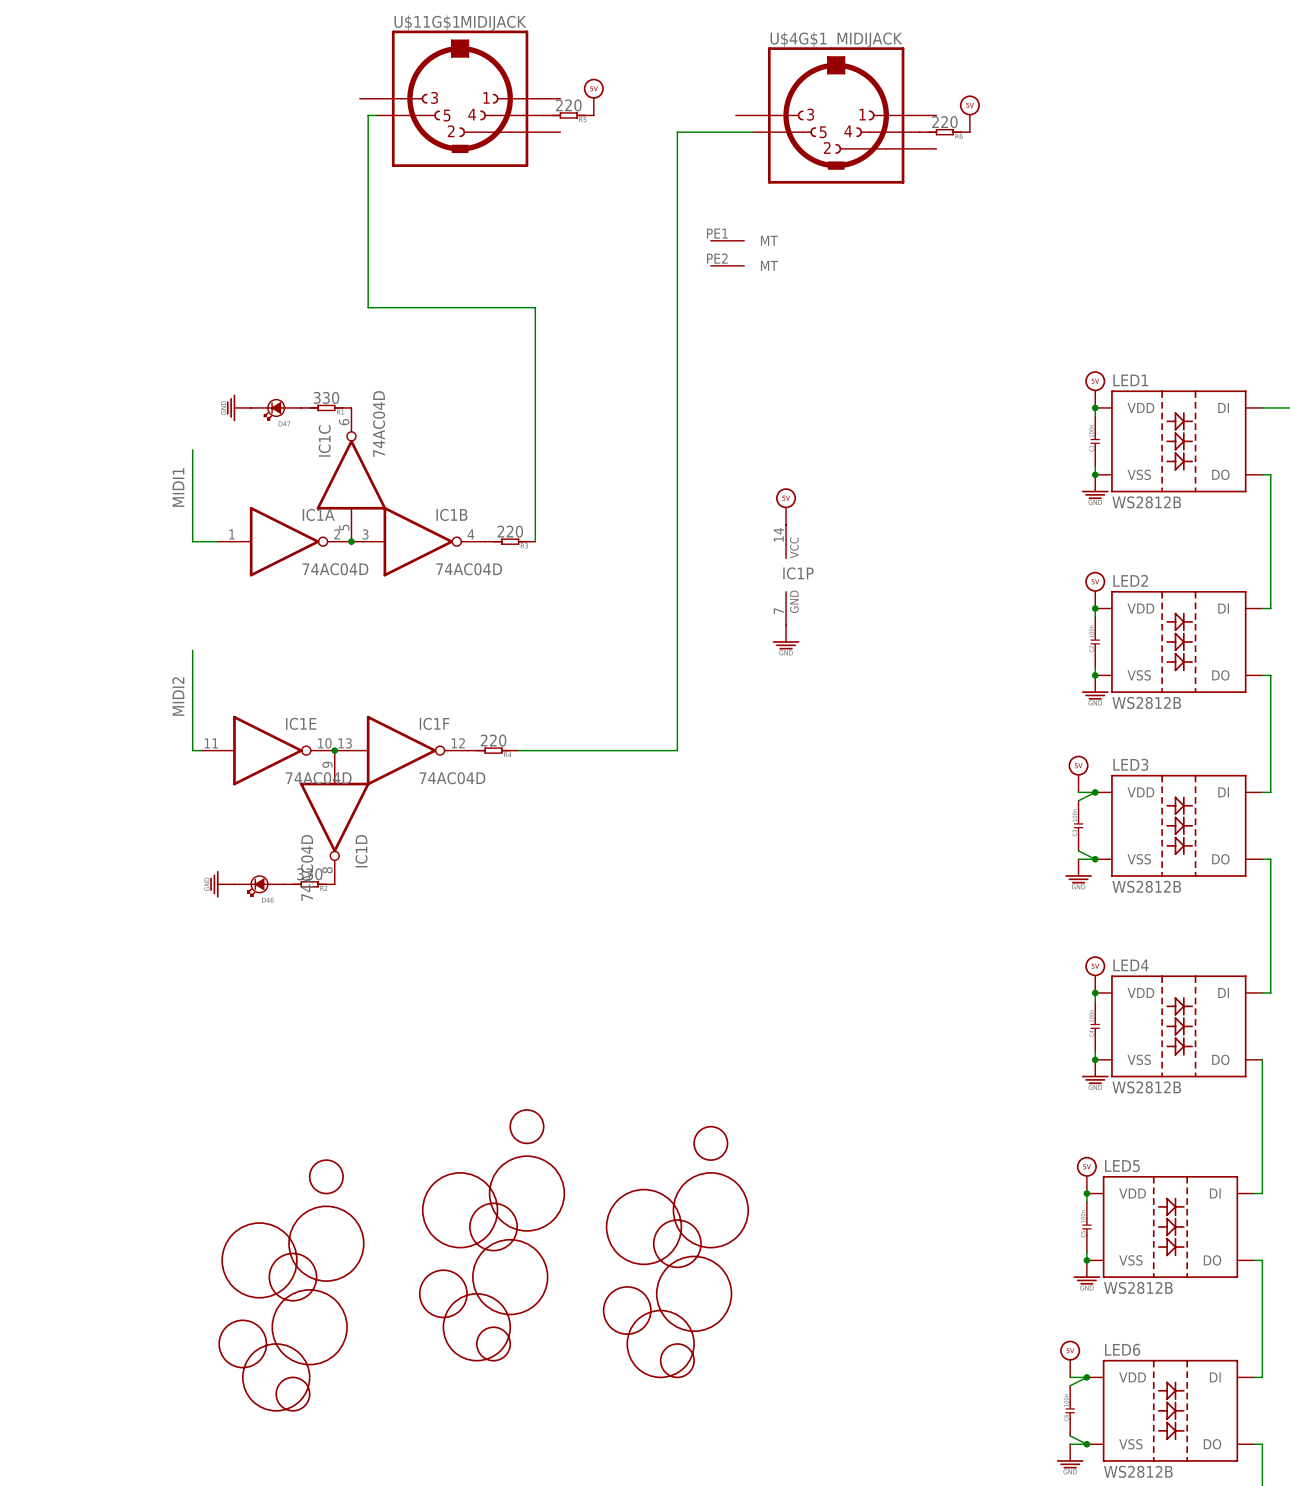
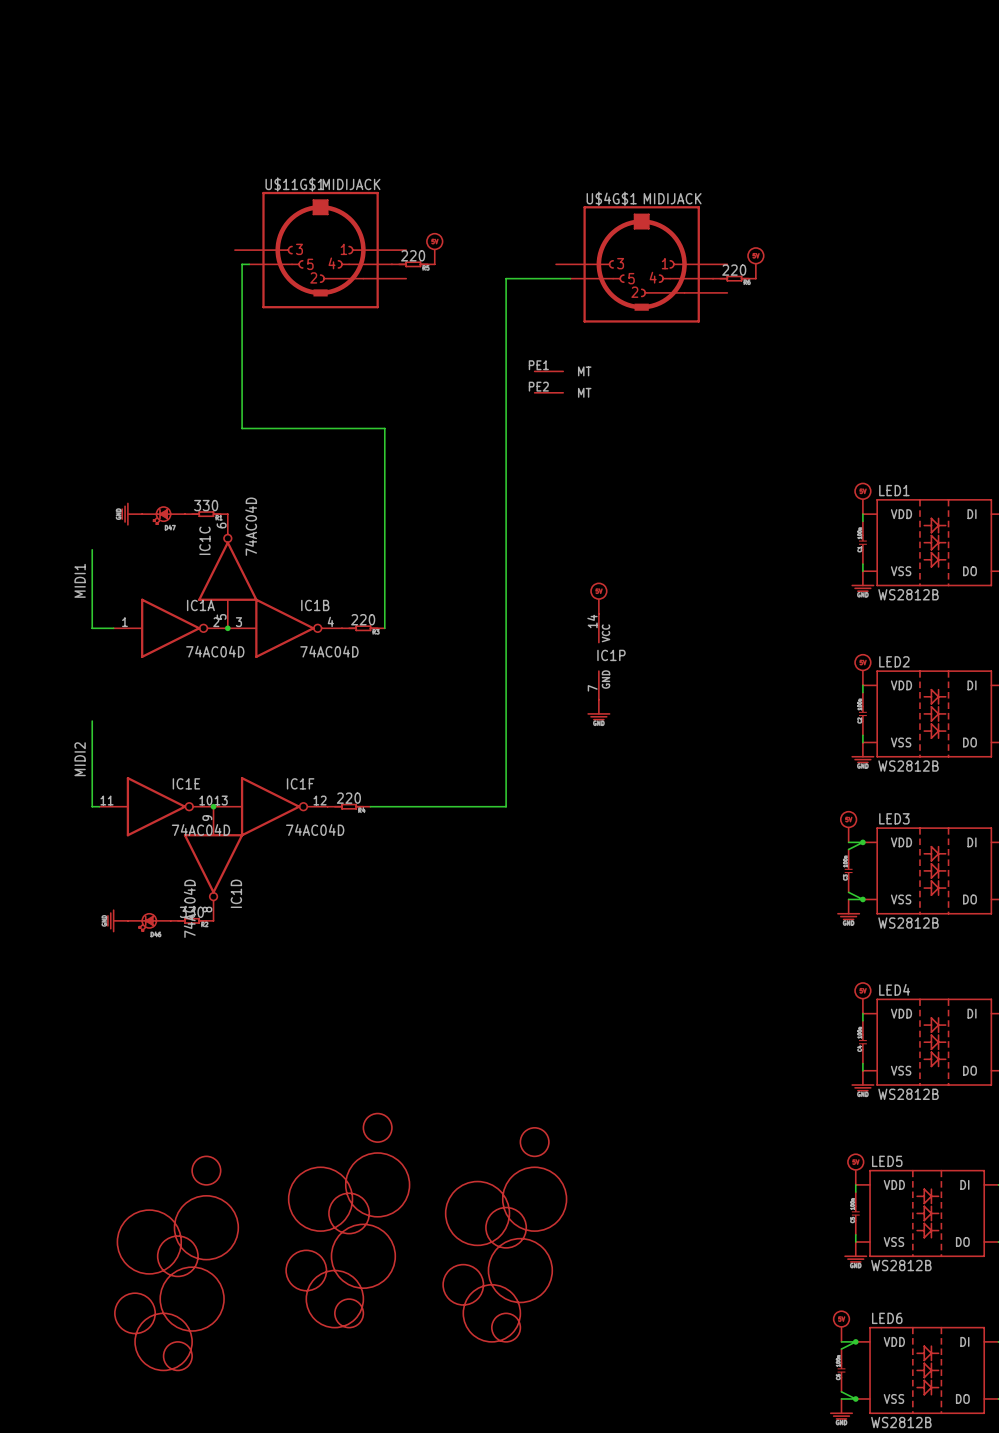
junction: (1095, 407) -> none
junction: (1095, 474) -> none
junction: (1095, 608) -> none
junction: (1095, 675) -> none
junction: (1095, 992) -> none
junction: (1095, 1059) -> none
junction: (1086, 1193) -> none
junction: (1086, 1260) -> none

